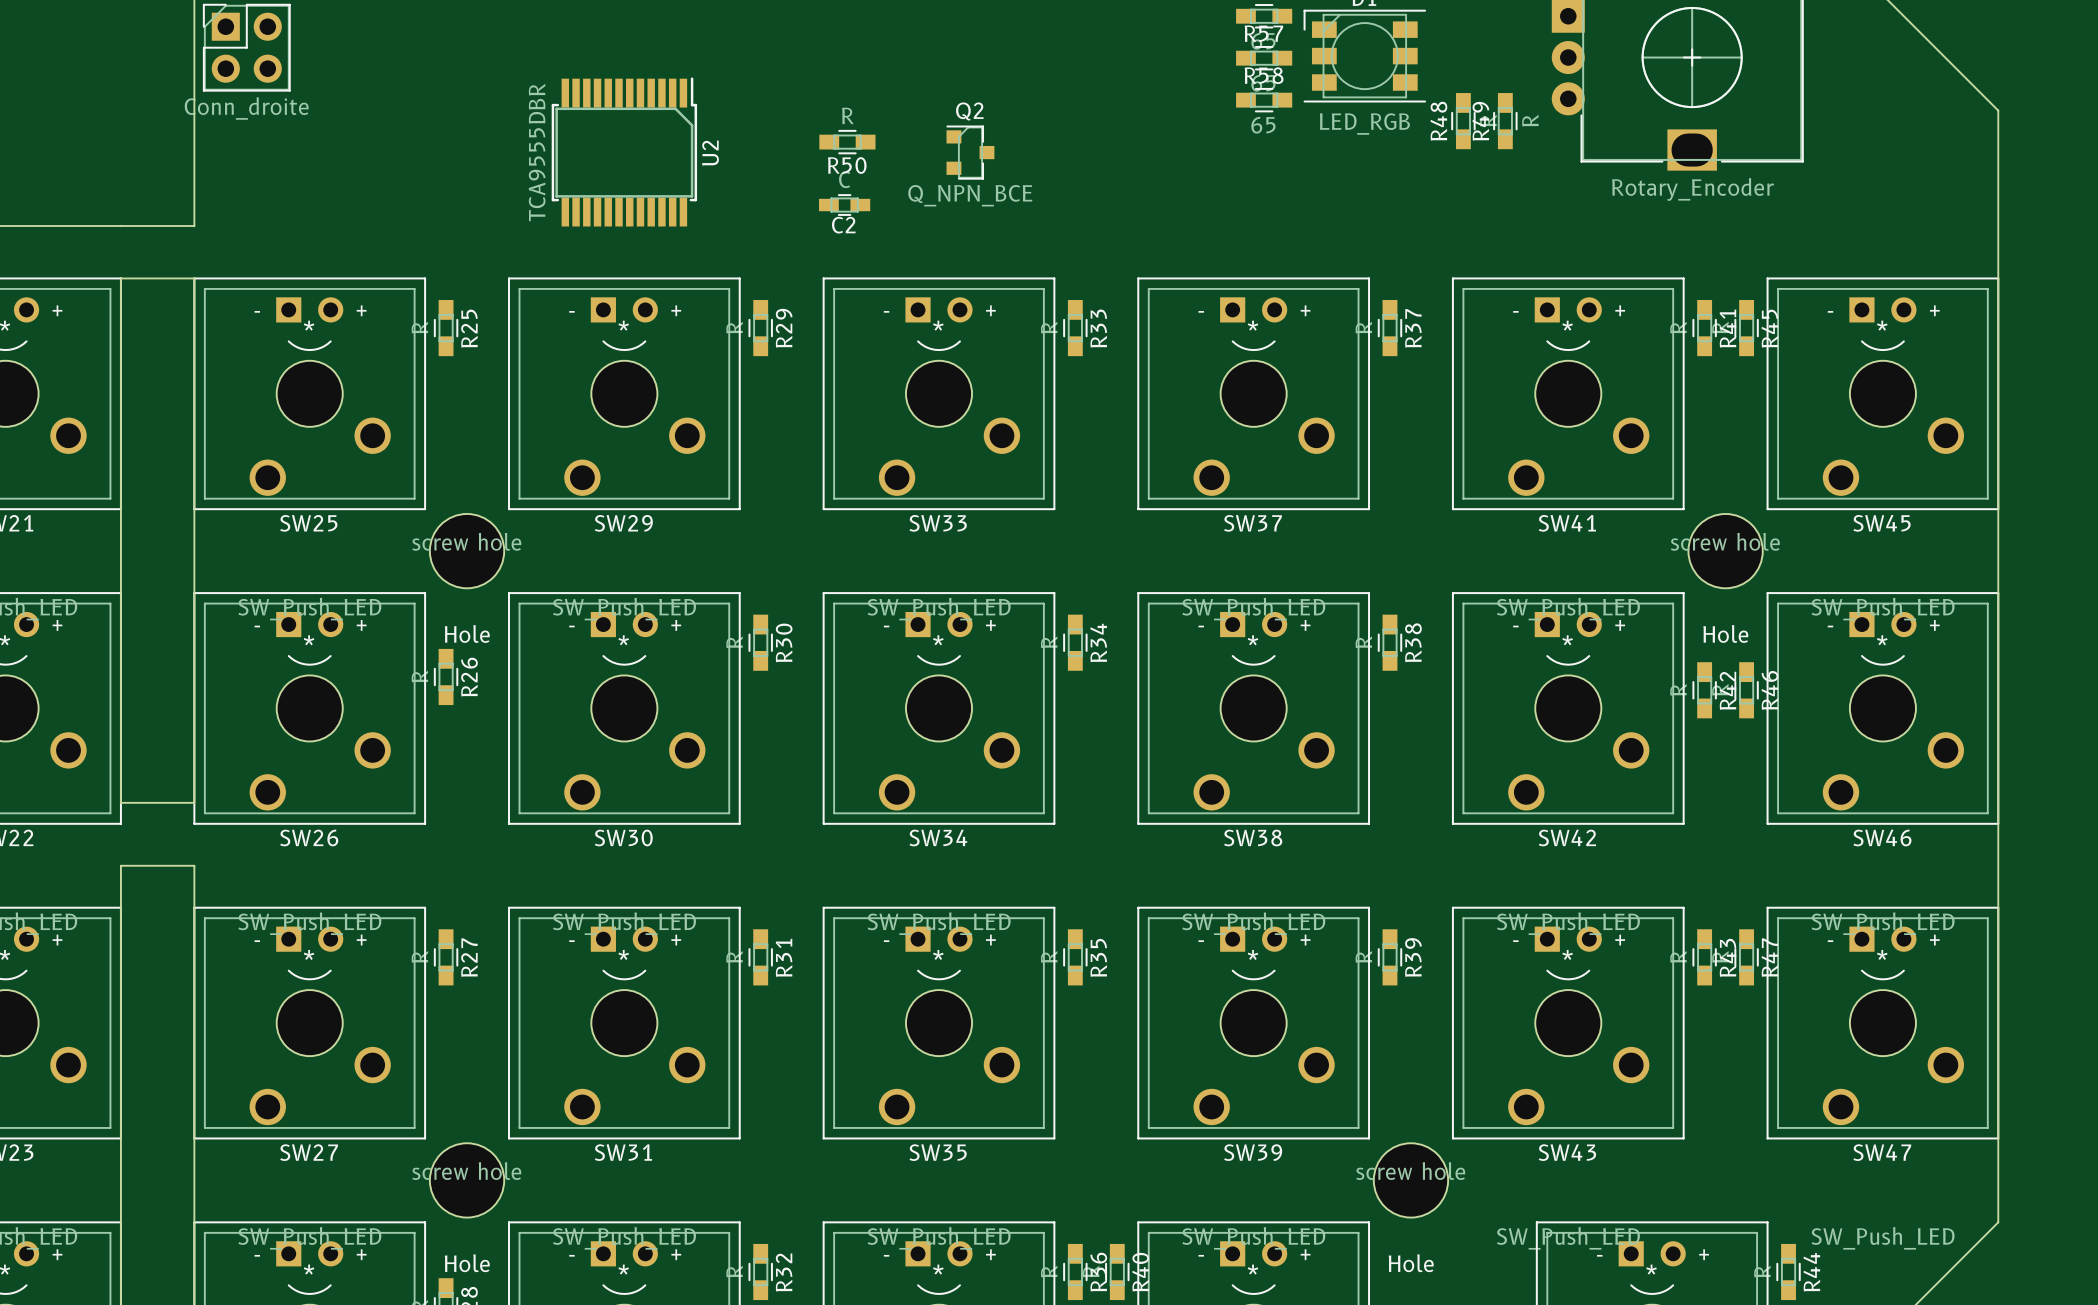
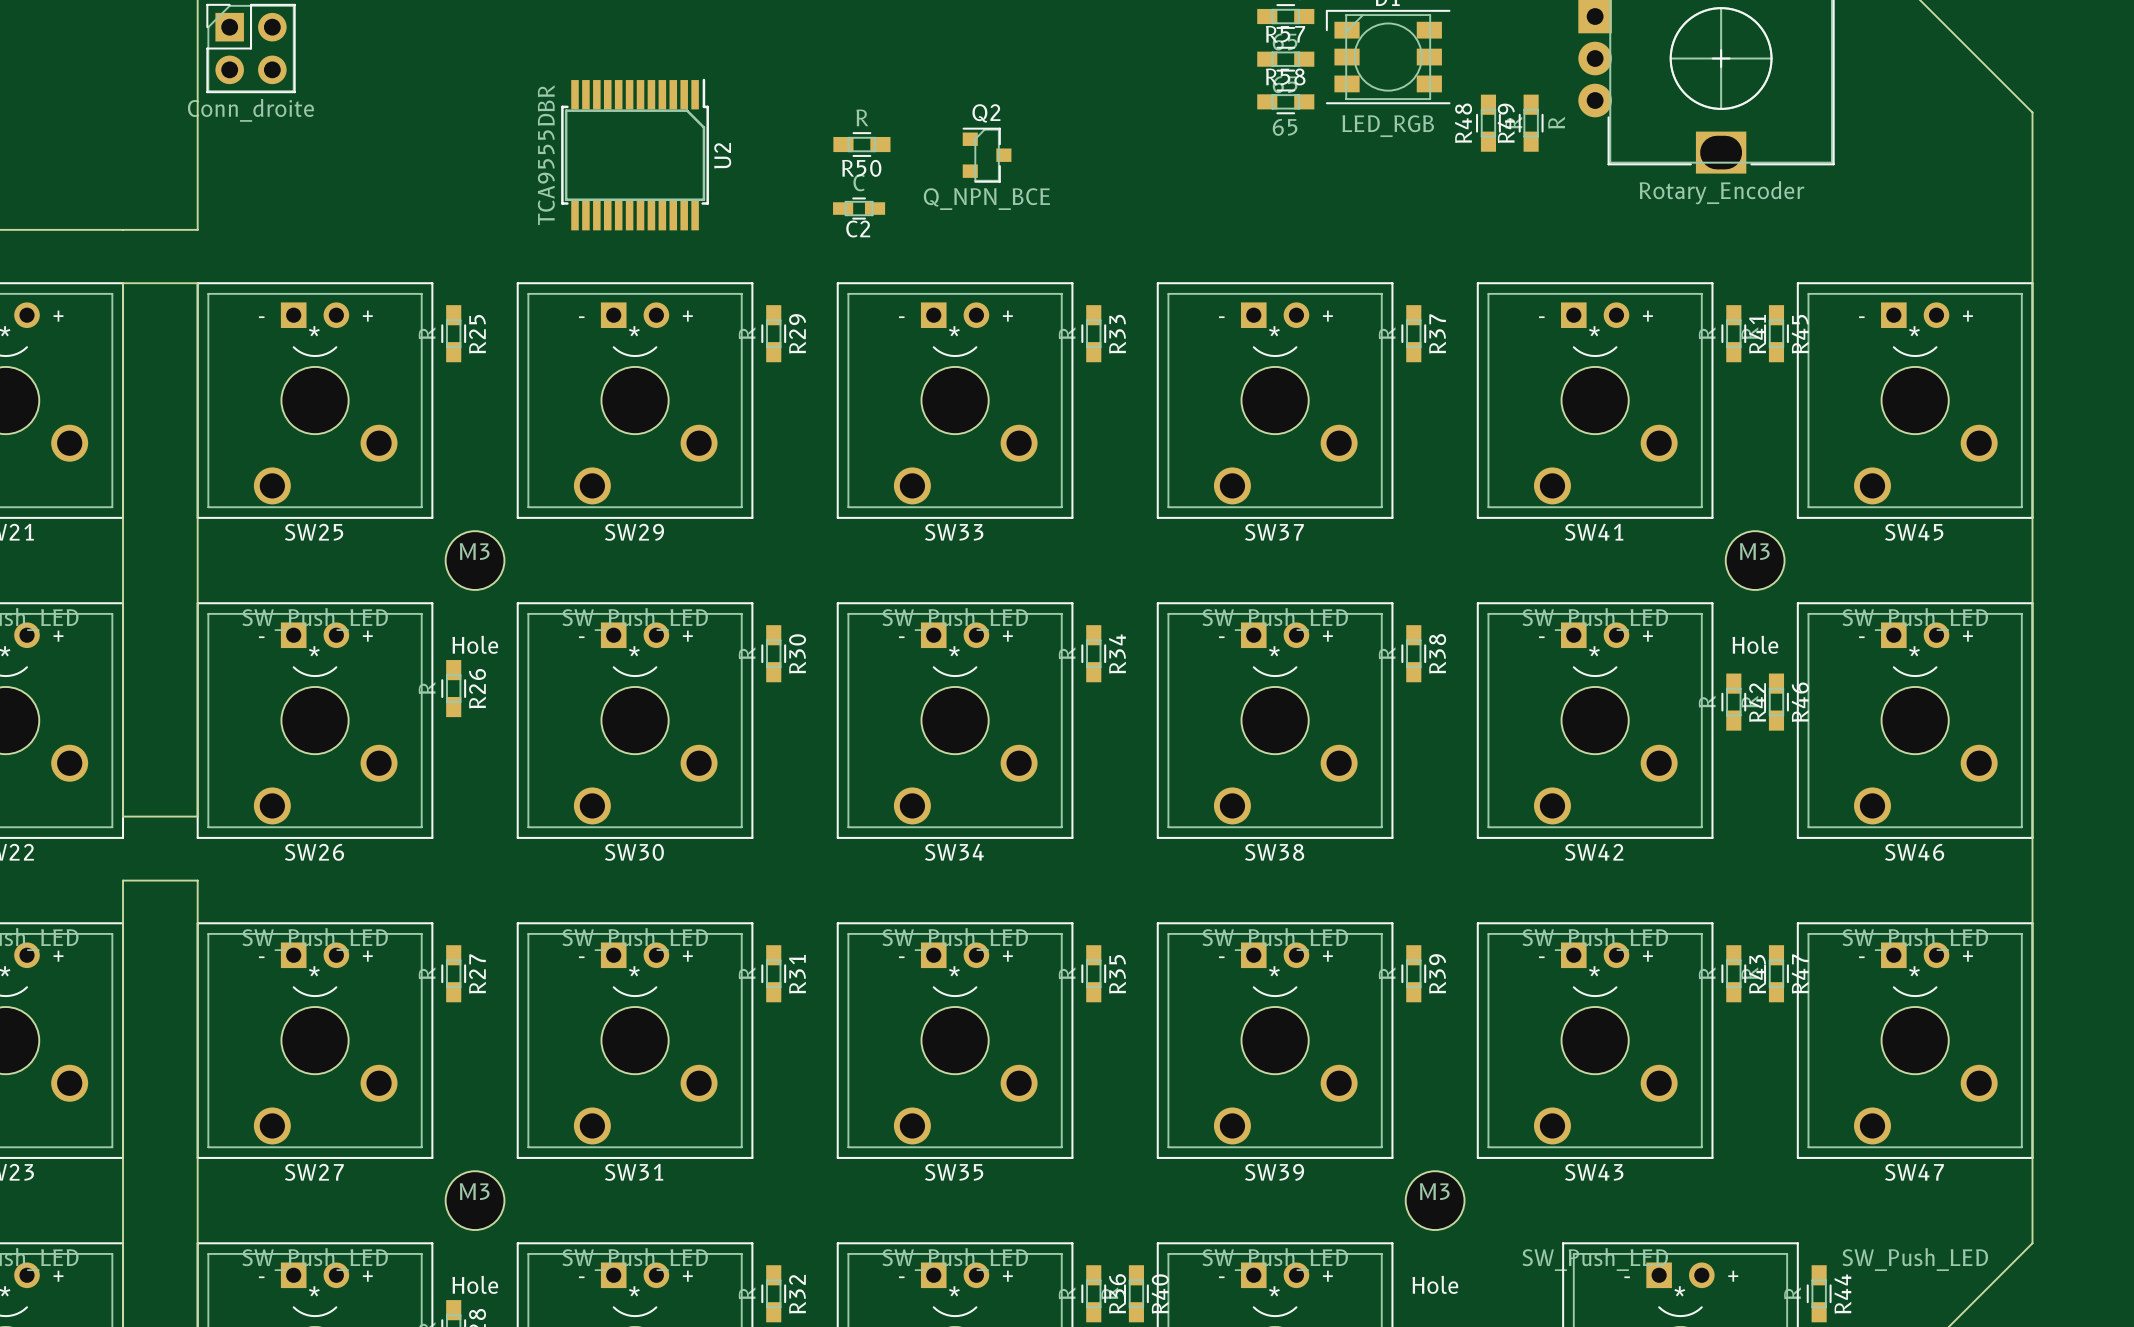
Hole footprint: [429, 513, 505, 589] -> [445, 531, 505, 590]
Hole footprint: [1688, 513, 1763, 589] -> [1725, 531, 1785, 590]
Hole value: screw hole (466, 541) -> M3 (474, 551)
Hole value: screw hole (1725, 541) -> M3 (1754, 551)
Hole footprint: [429, 1143, 505, 1218] -> [445, 1171, 505, 1231]
Hole footprint: [1373, 1143, 1449, 1218] -> [1405, 1171, 1465, 1231]
Hole value: screw hole (466, 1171) -> M3 (474, 1191)
Hole value: screw hole (1410, 1171) -> M3 (1434, 1191)

